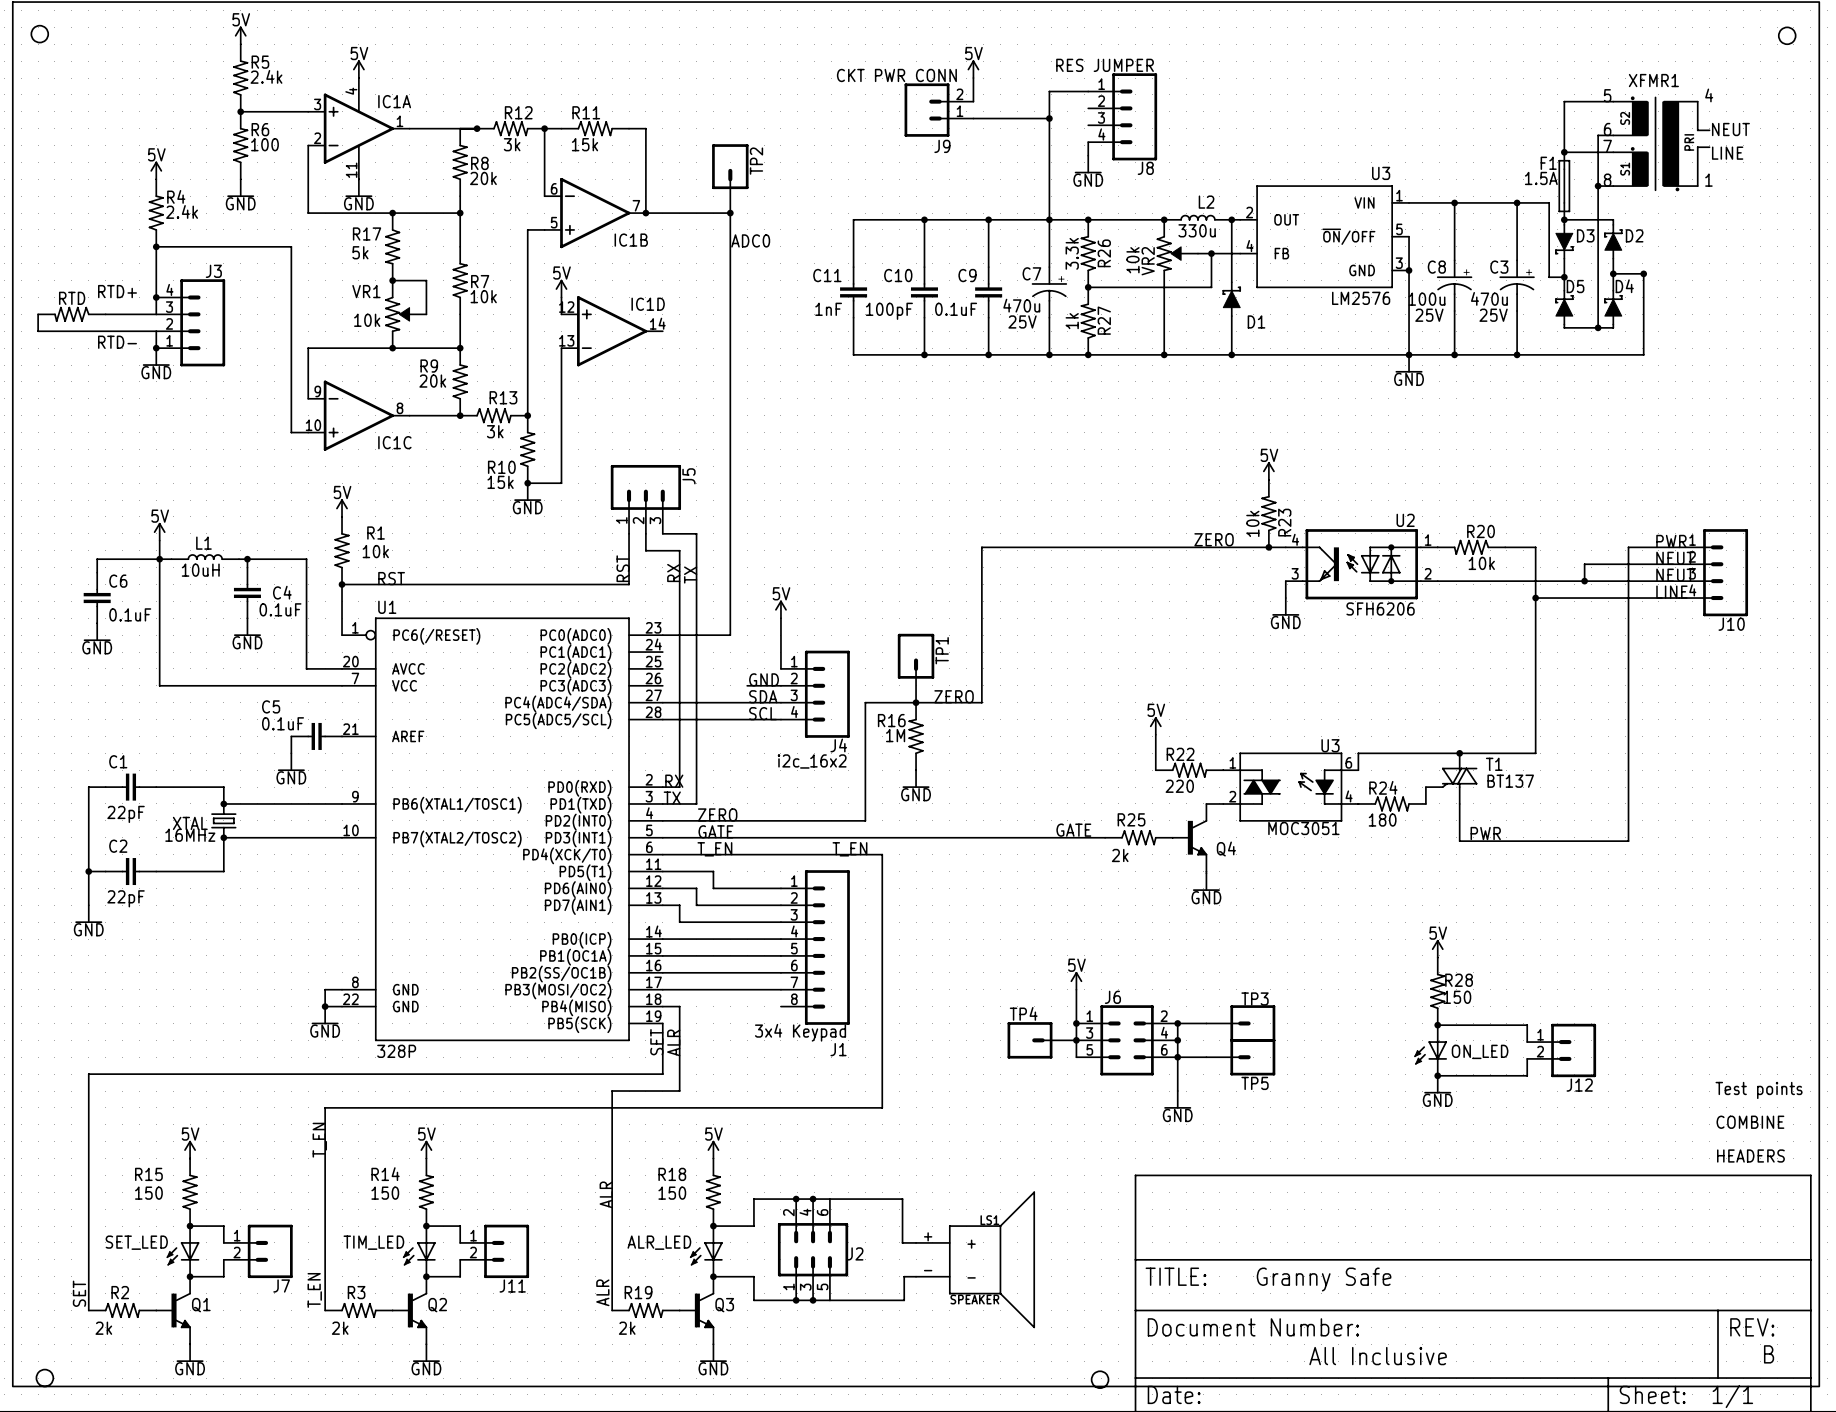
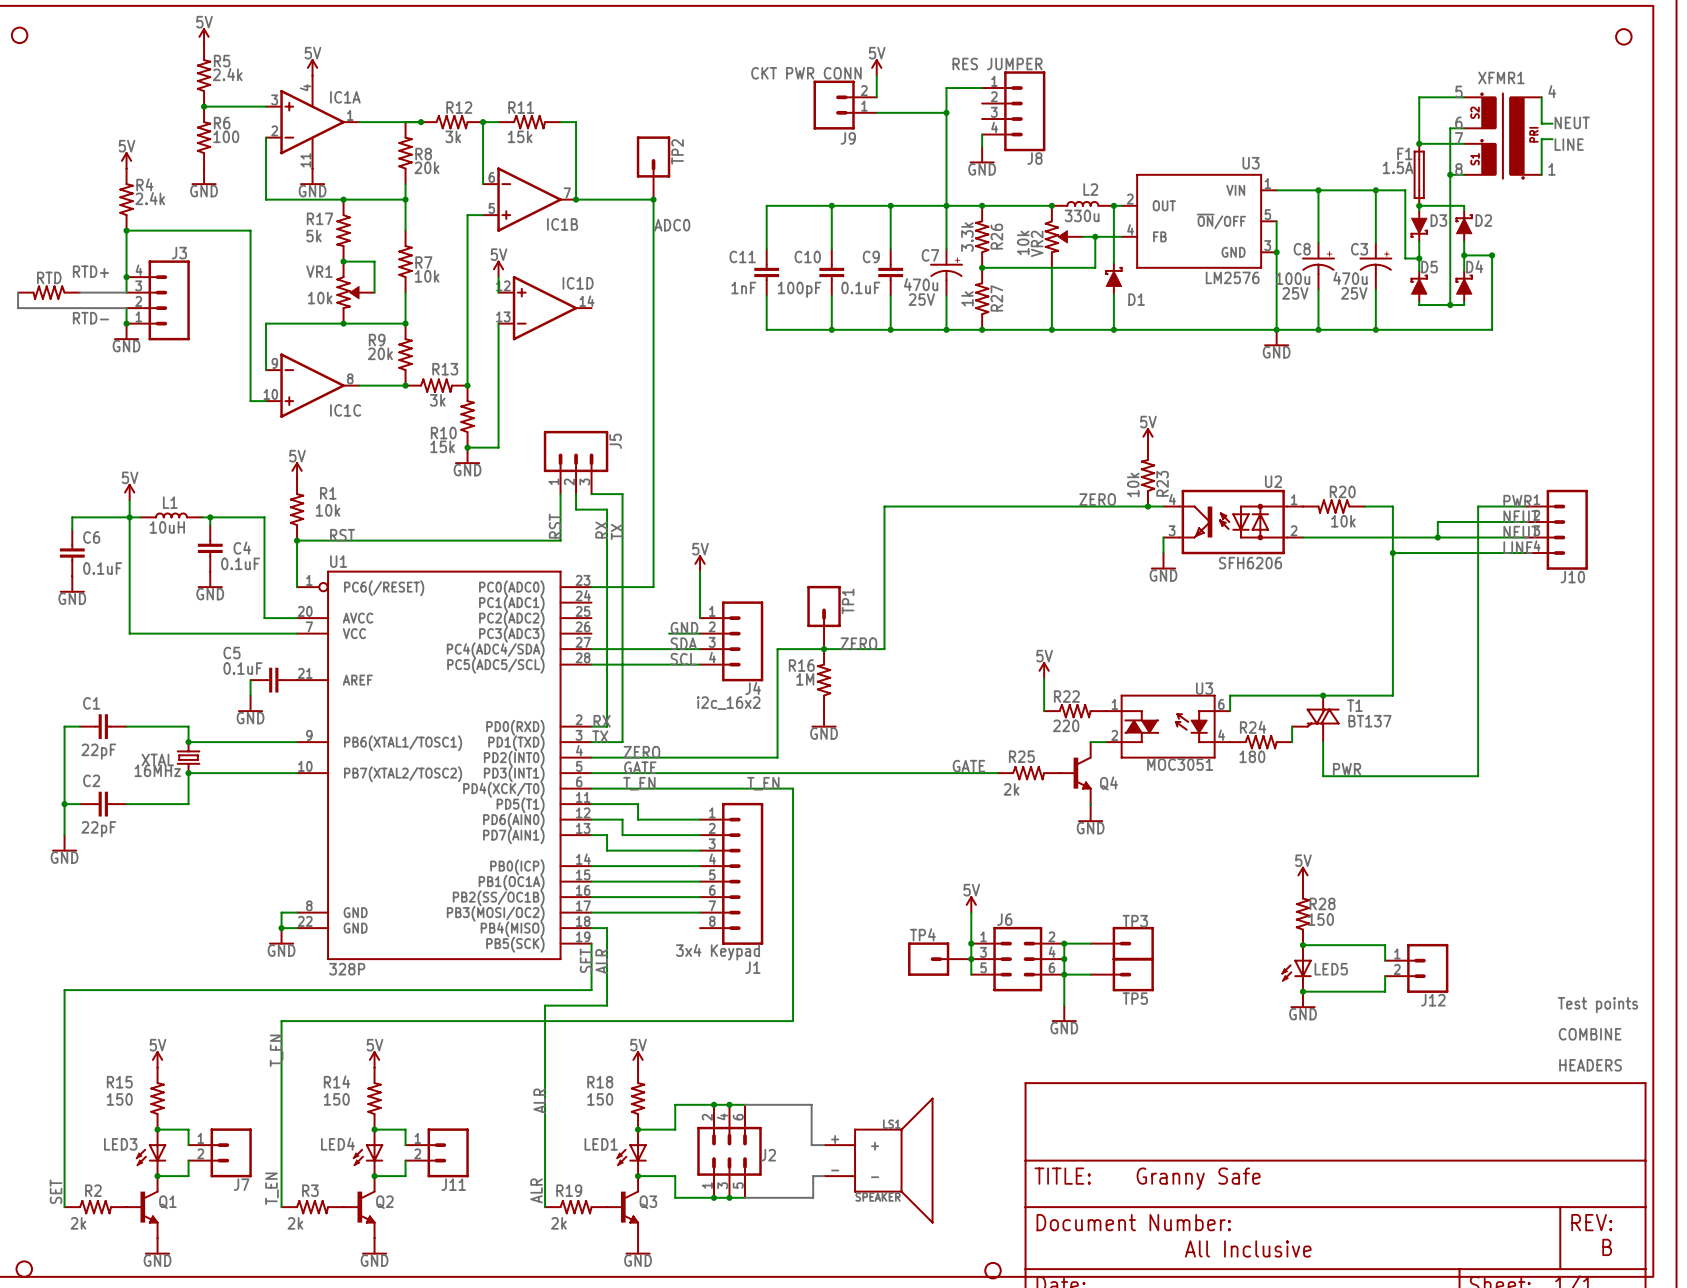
ON_LED name: ON_LED (1480, 1051) -> LED5 (1331, 969)
SET_LED name: SET_LED (136, 1242) -> LED3 (120, 1144)
TIM_LED name: TIM_LED (373, 1242) -> LED4 (337, 1144)
ALR_LED name: ALR_LED (659, 1242) -> LED1 (601, 1144)

